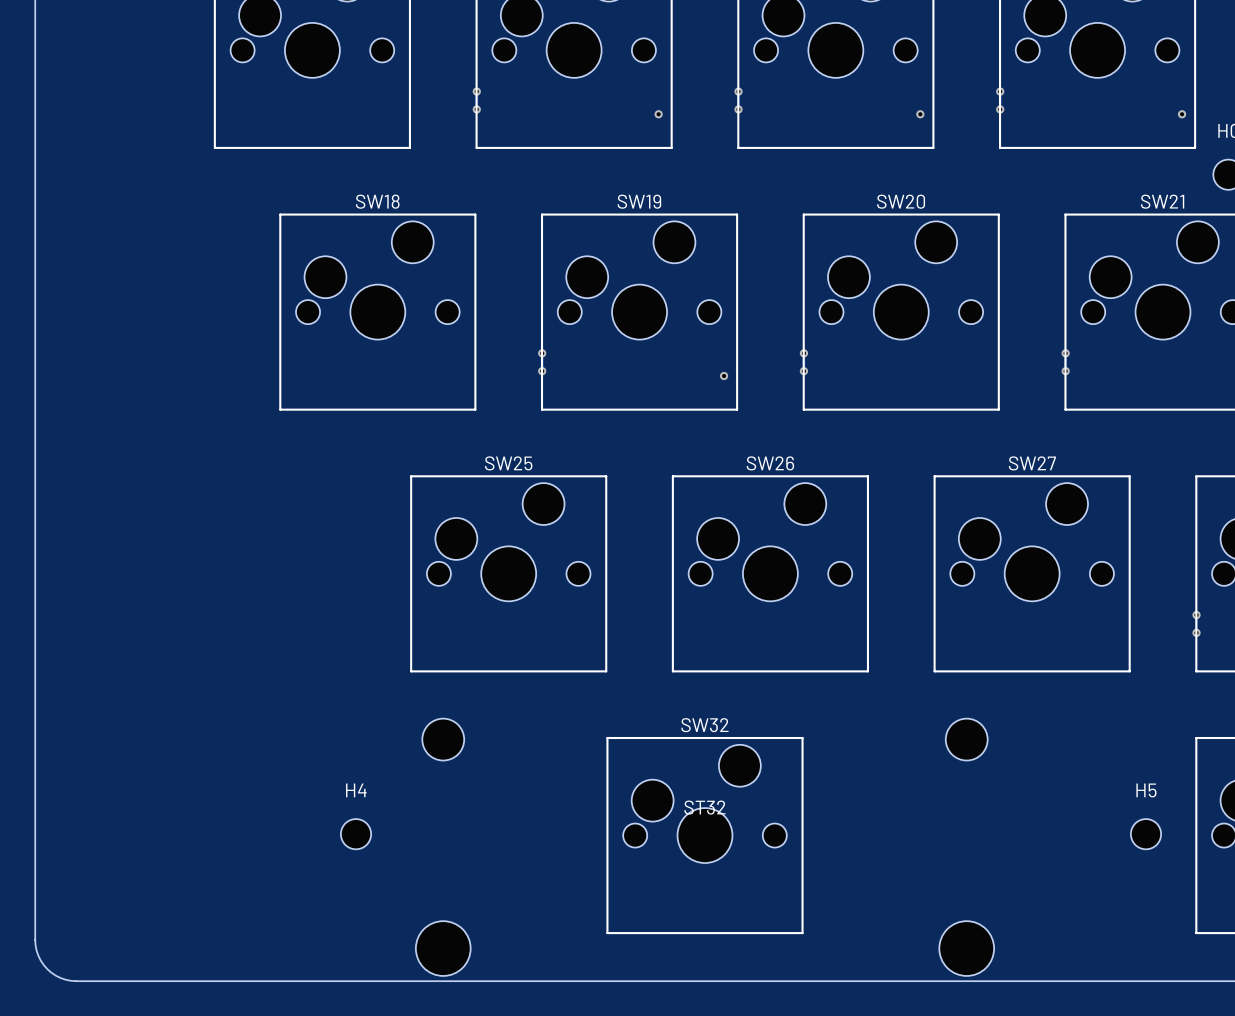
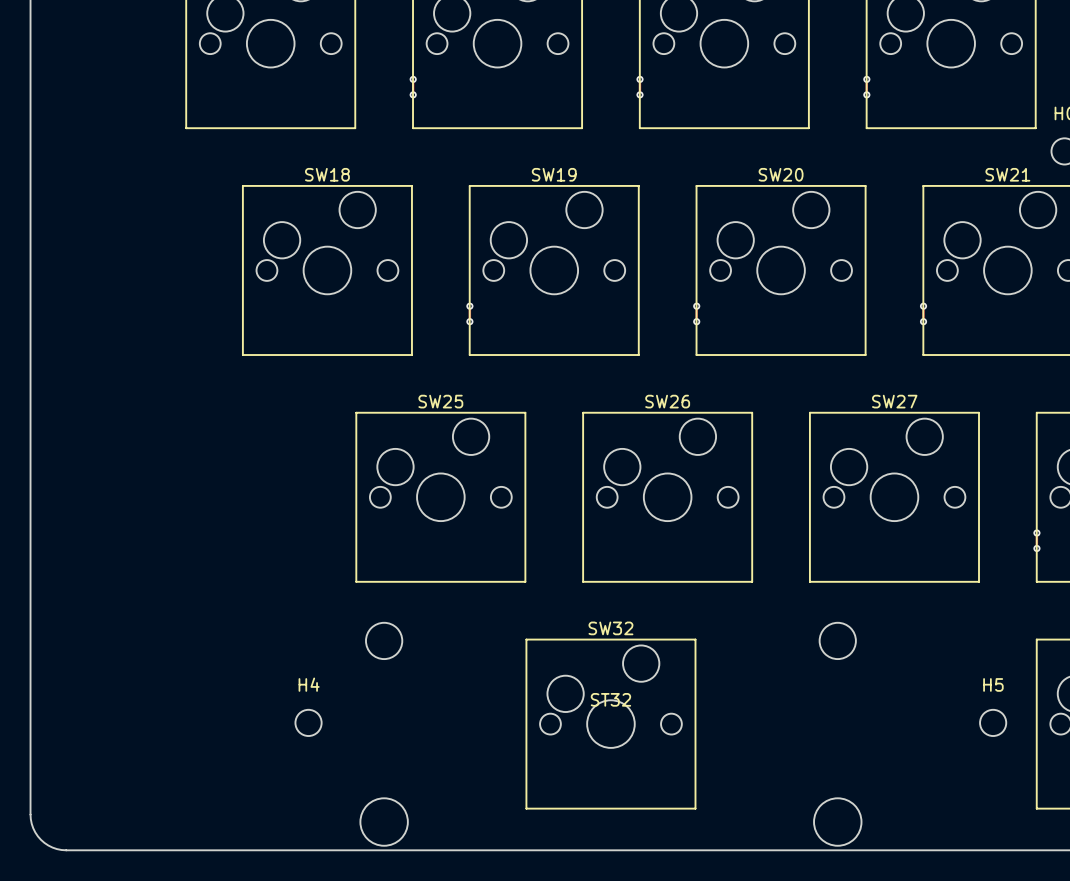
via: (658, 114) -> none
via: (920, 114) -> none
via: (1182, 114) -> none
via: (724, 375) -> none

